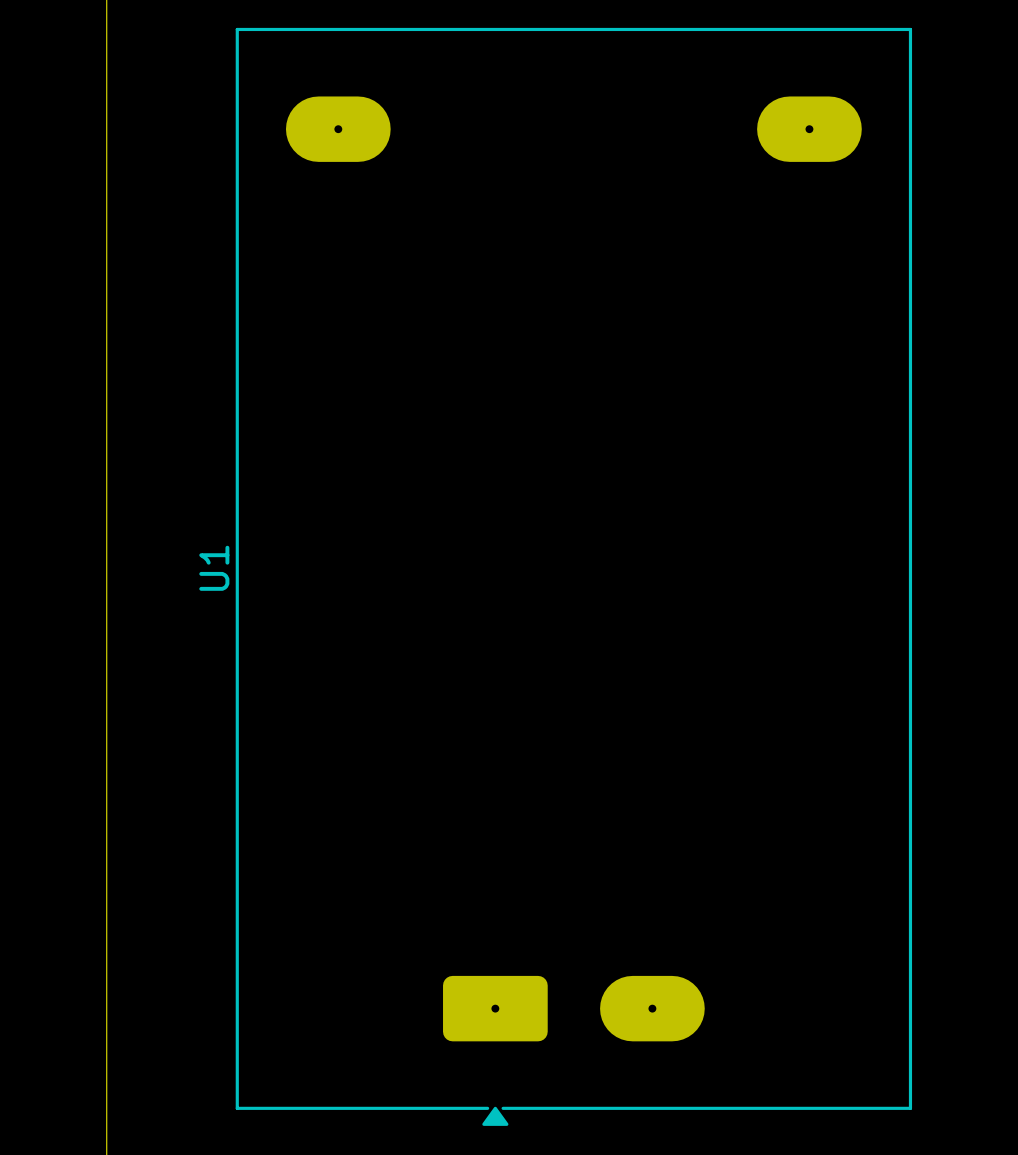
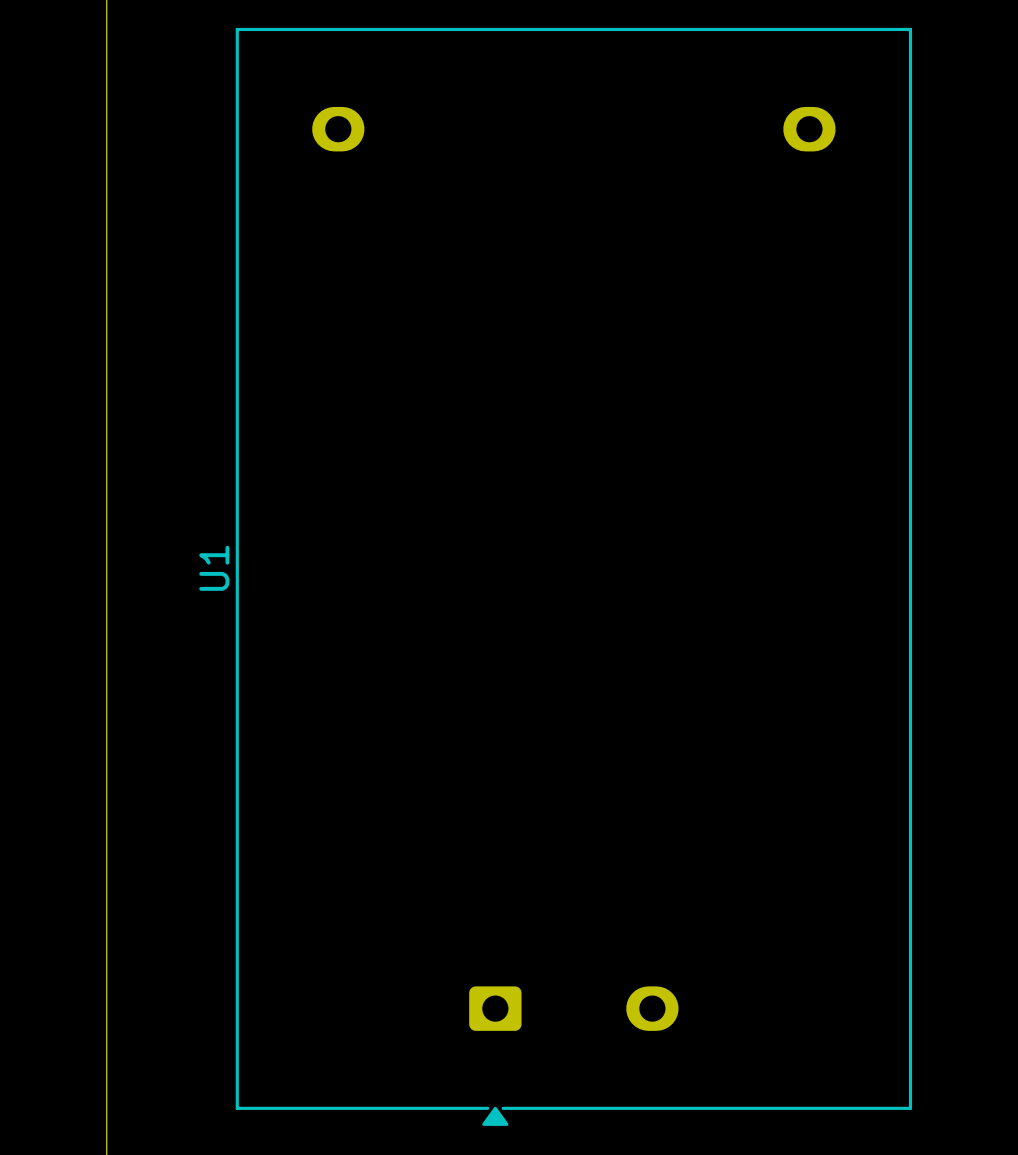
U1 footprint: [235, 27, 913, 1126] -> [235, 27, 913, 1126]

